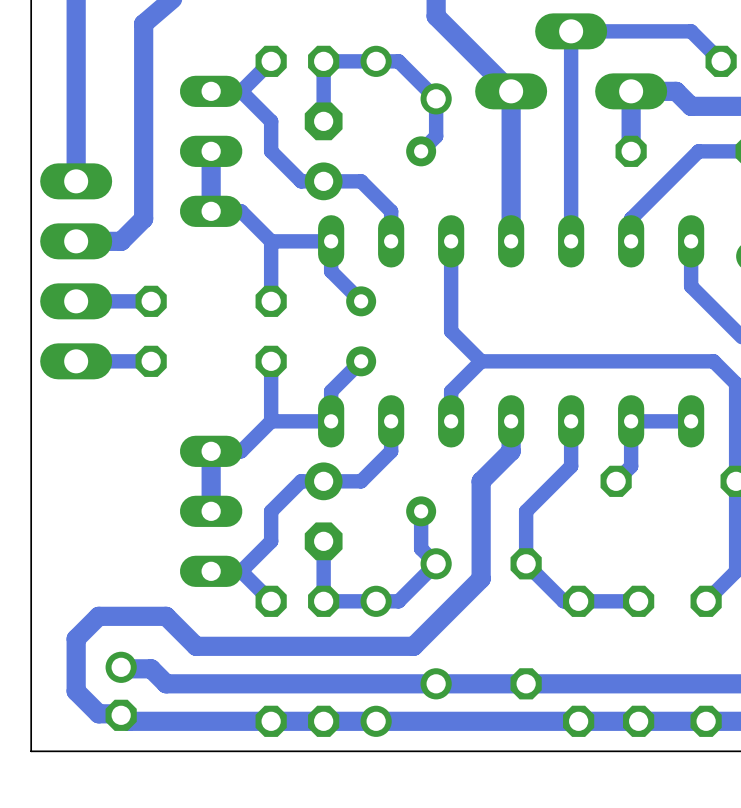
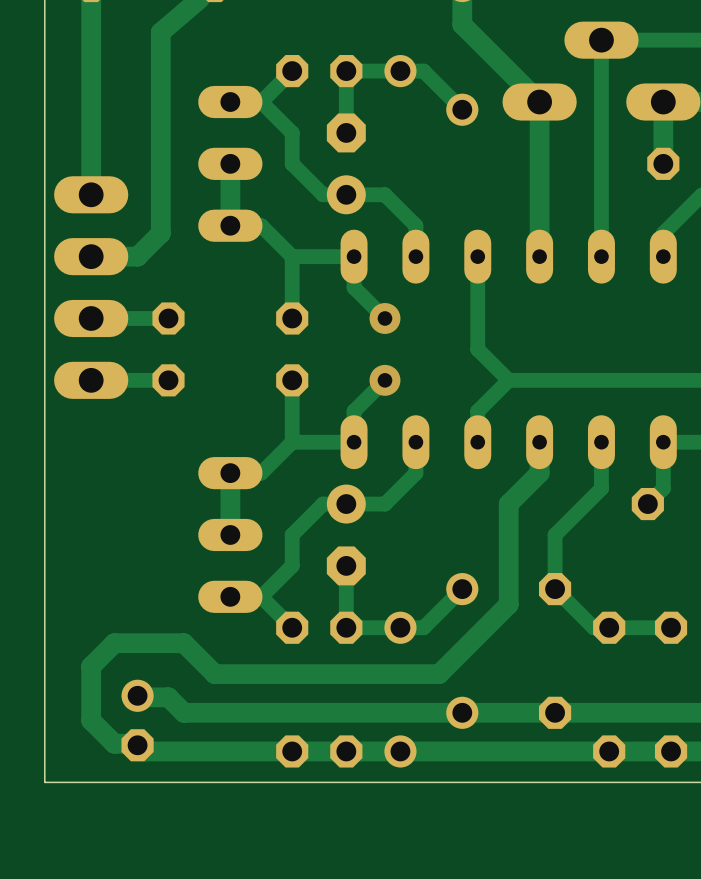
track: (436, 98) (436, 136) (421, 151) -> none
via: (421, 151) -> none
track: (421, 511) (421, 548) (436, 563) -> none
via: (421, 511) -> none

